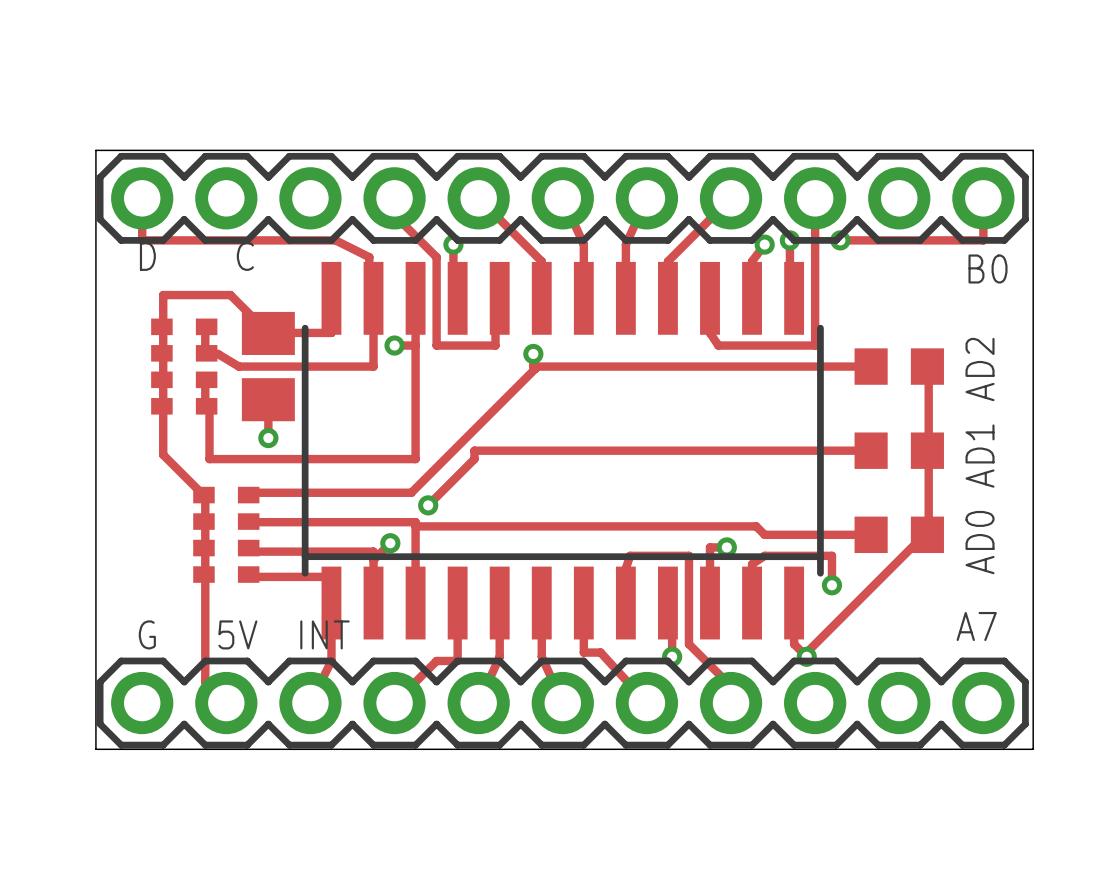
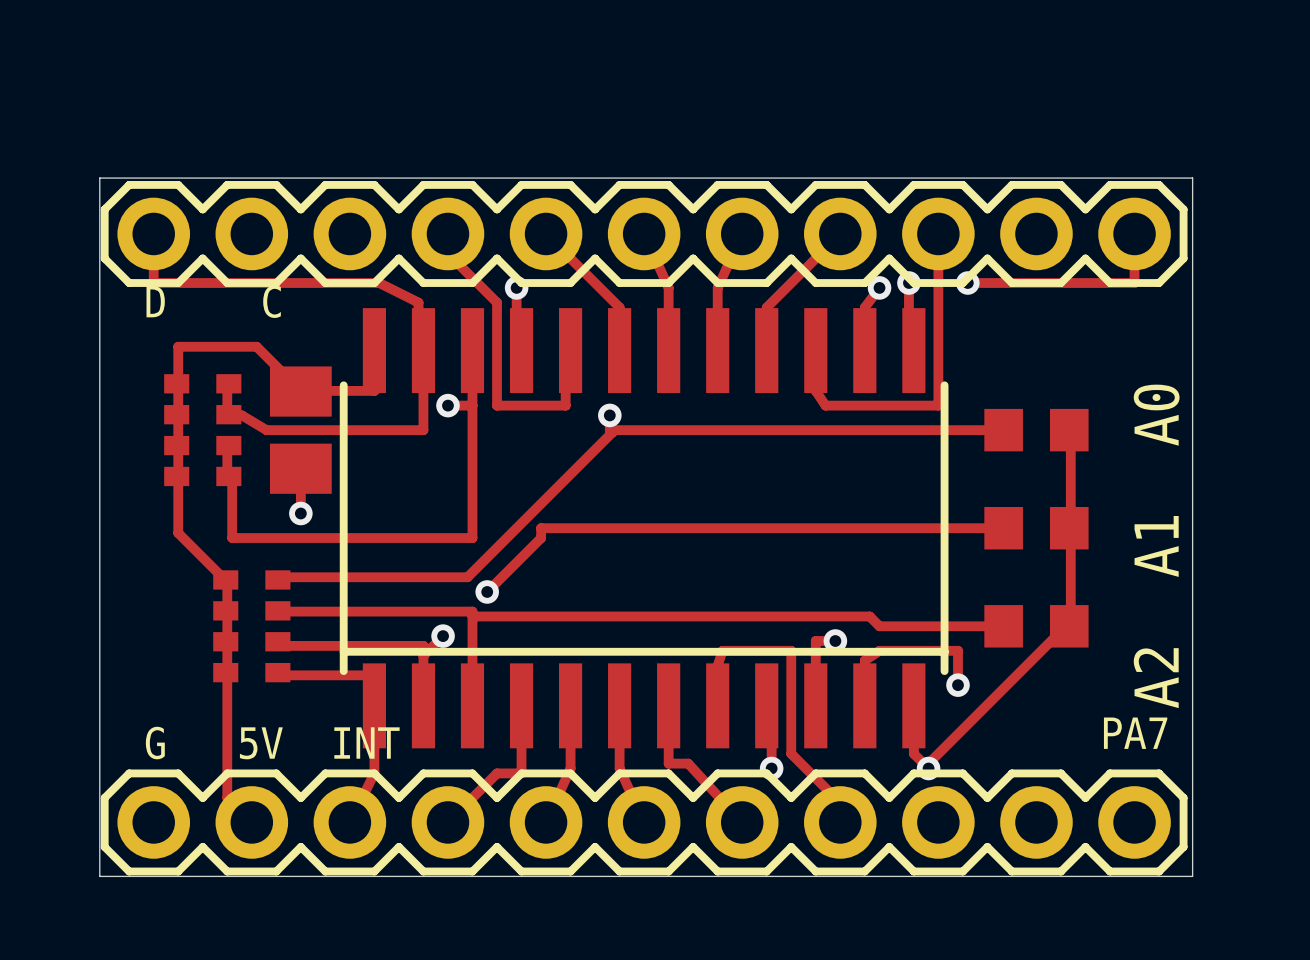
text: B0 (987, 269) -> none
text: AD0 AD1 AD2 (980, 456) -> A2 A1 A0 (1156, 546)
text: A7 (976, 626) -> PA7 (1135, 733)

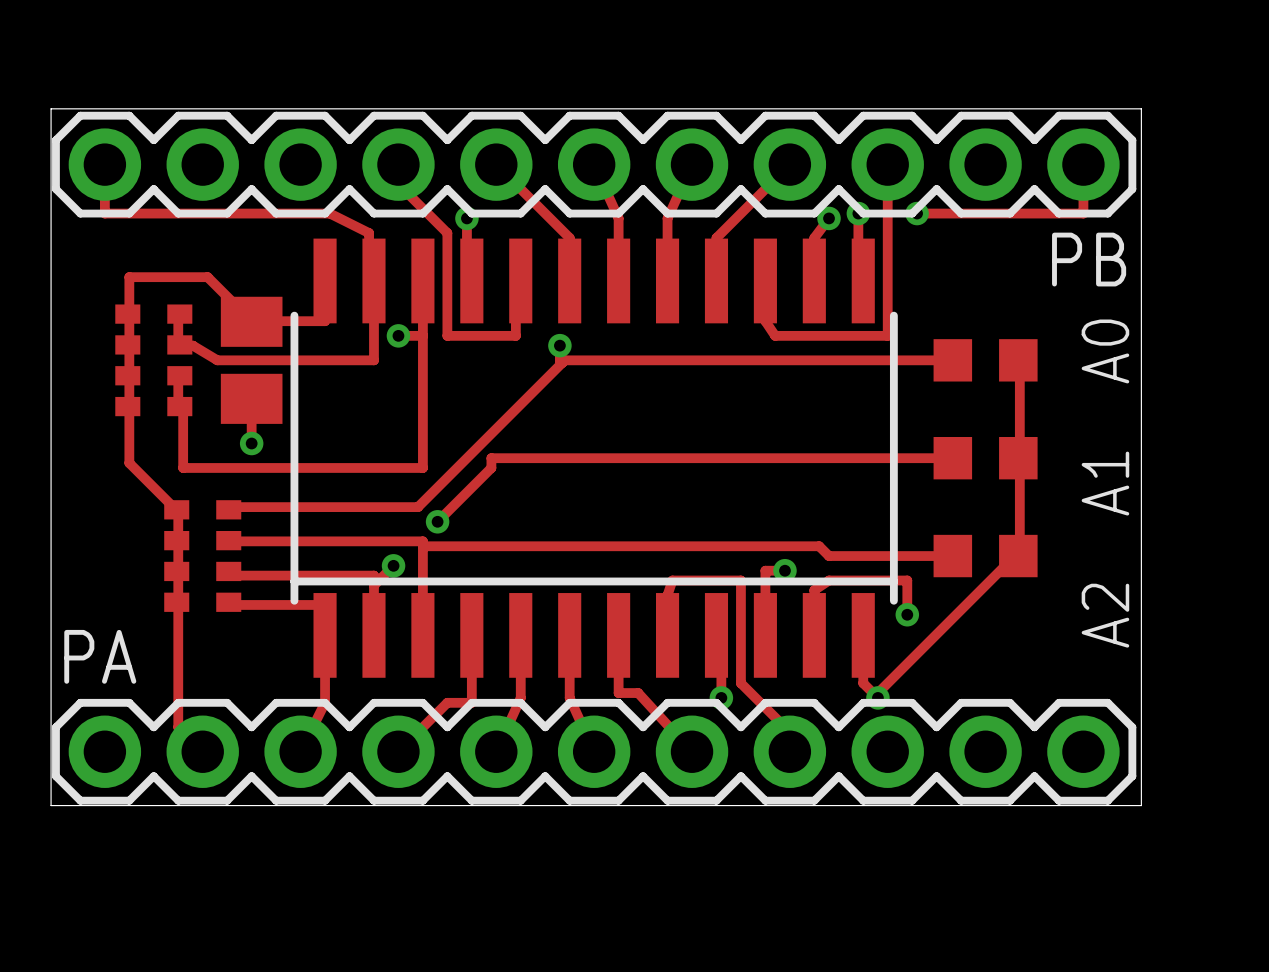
text: D C (213, 301) -> none
PB name: none -> PB (1089, 259)
PA name: none -> PA (100, 656)
text: PA7 (1135, 733) -> none
text: G 5V INT (272, 743) -> none

